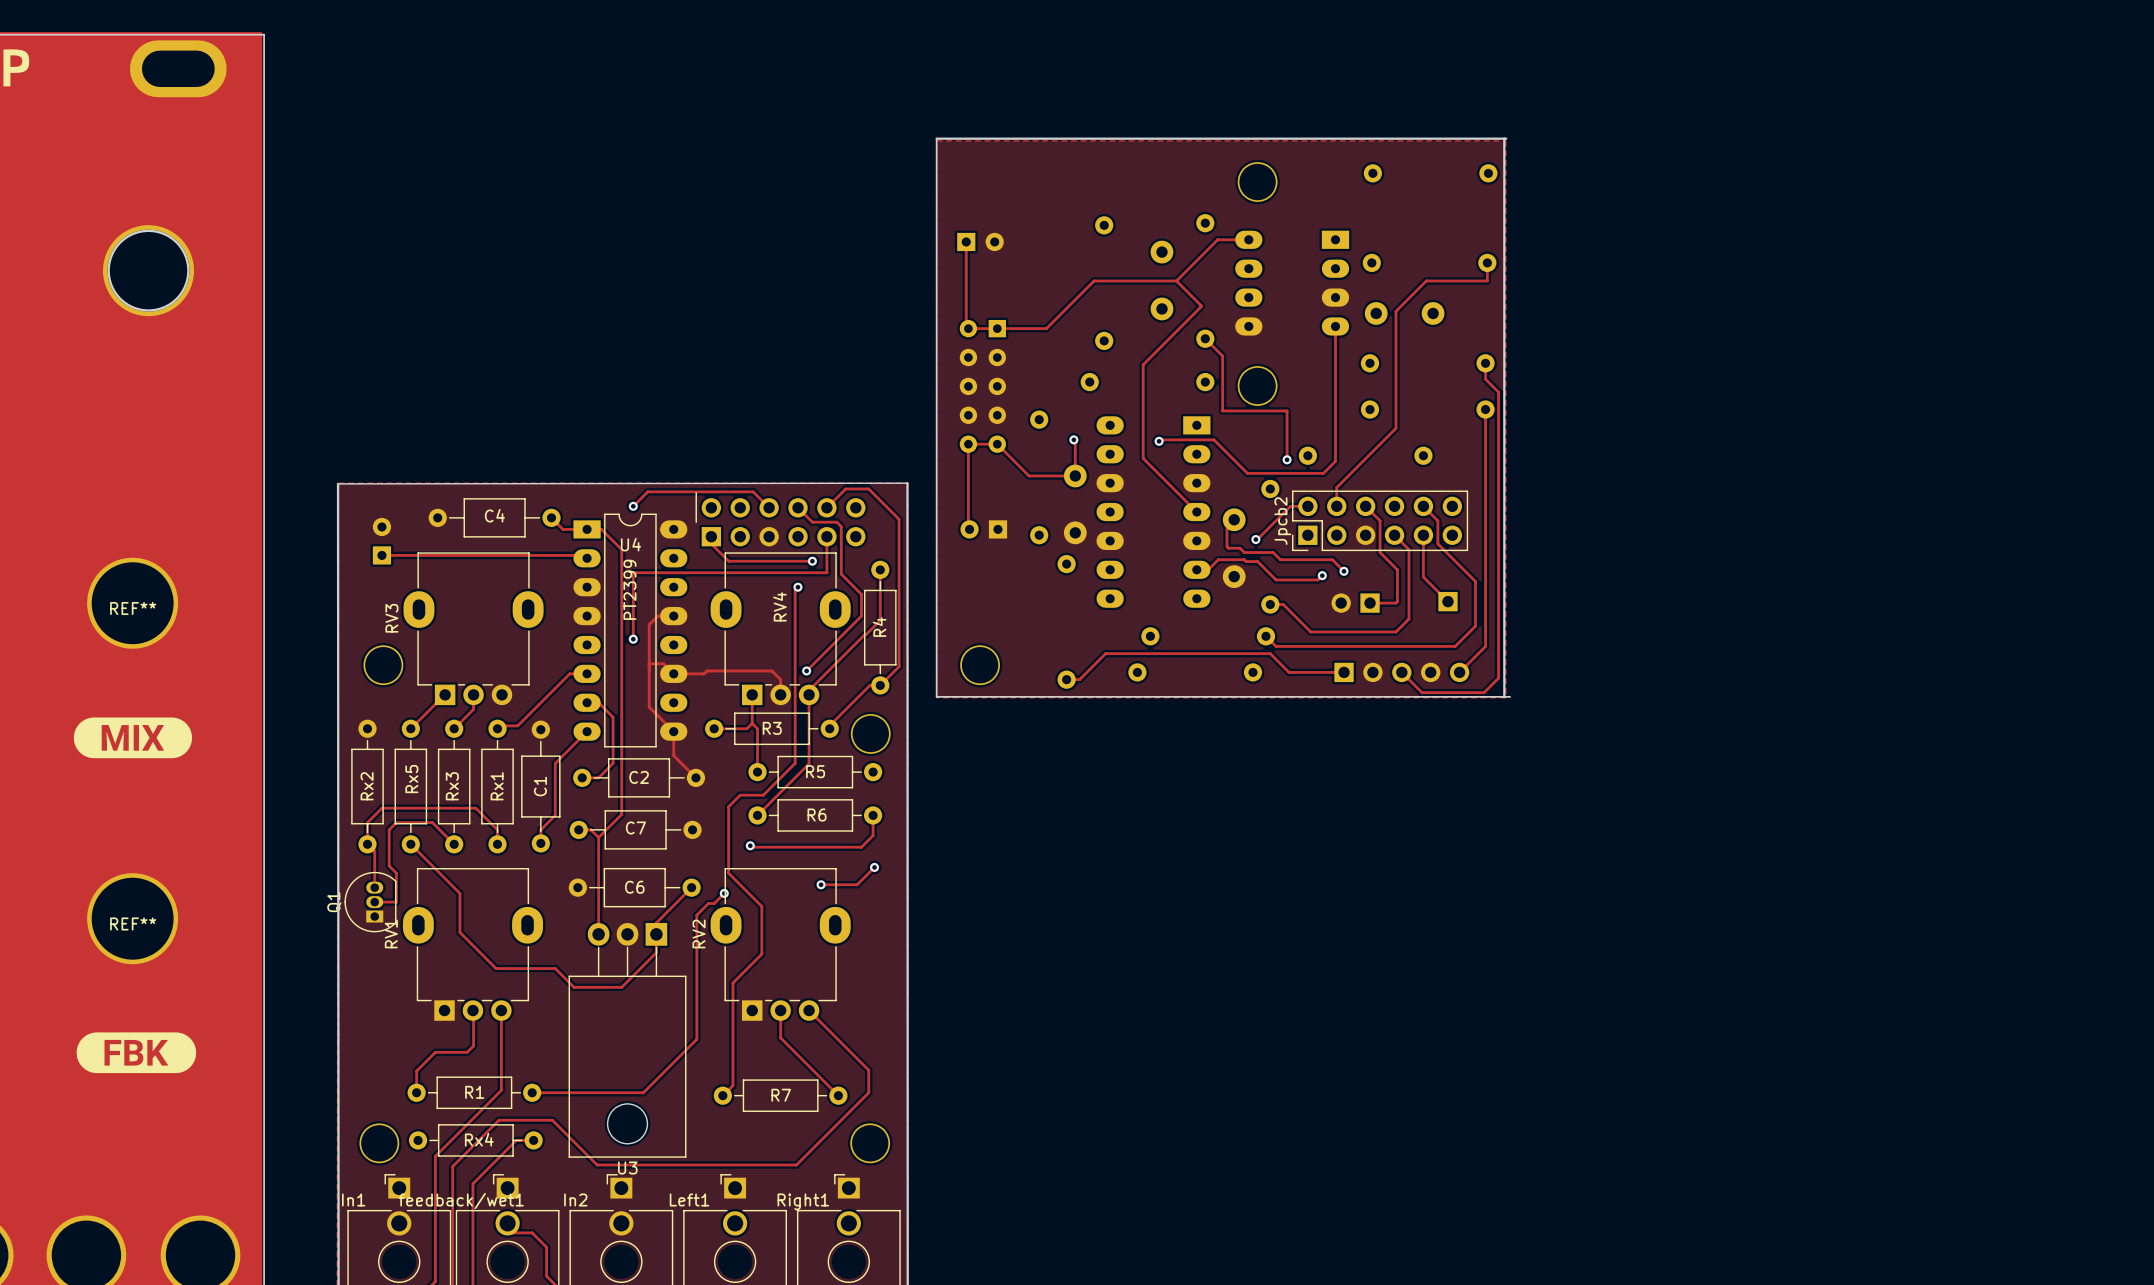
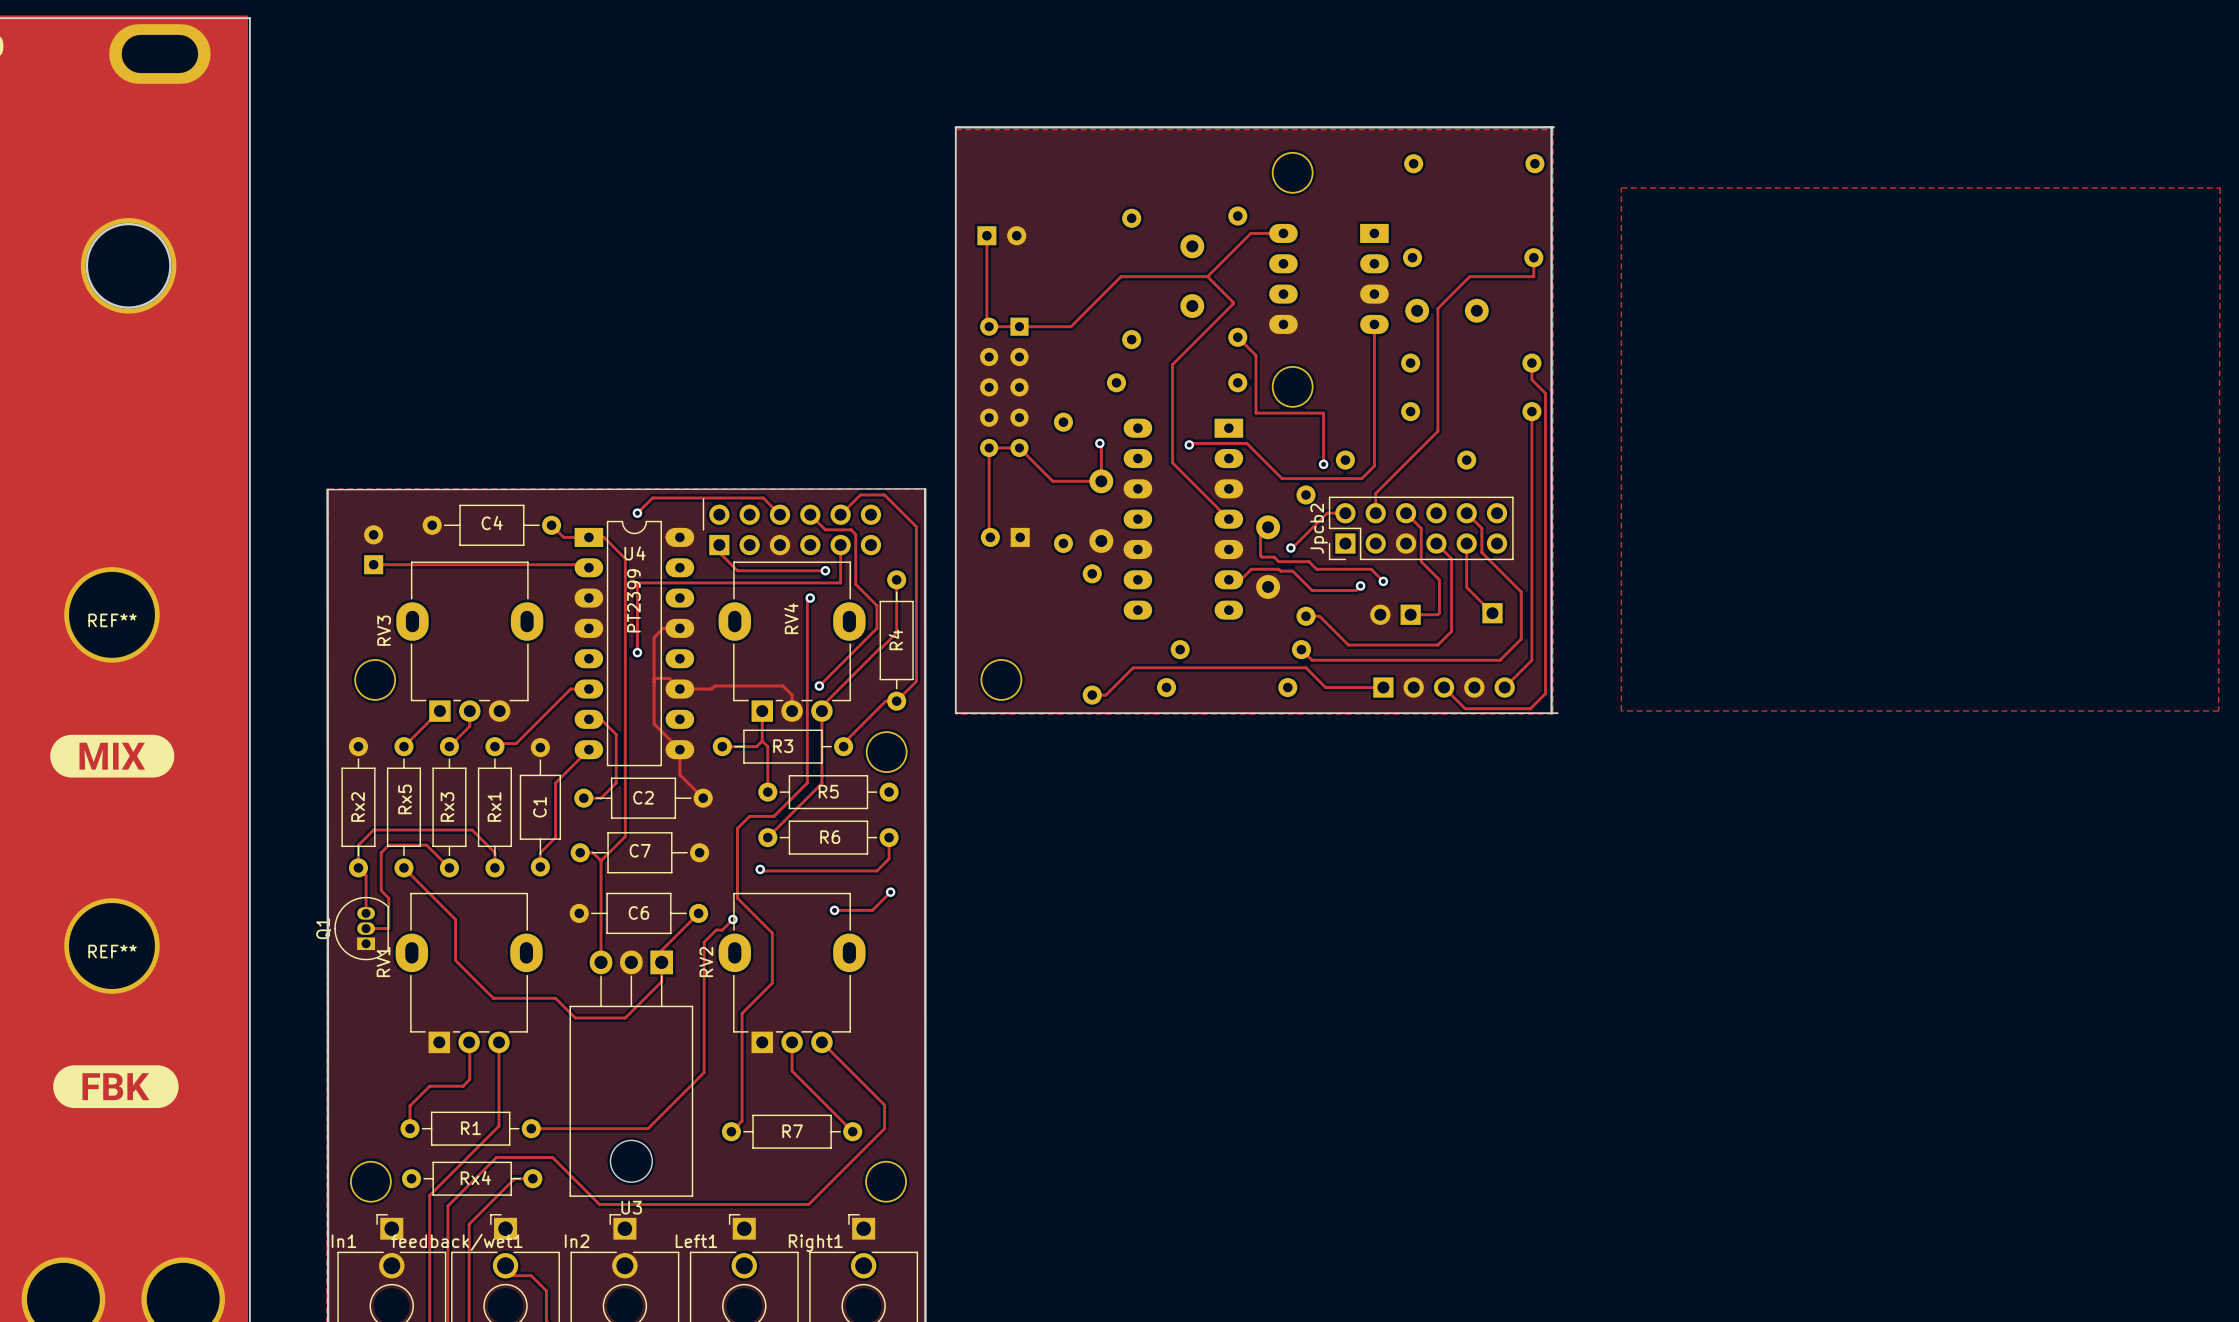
zone outline: none -> (1621, 187) (1621, 711) (2218, 711) (2220, 187) (1621, 187)

